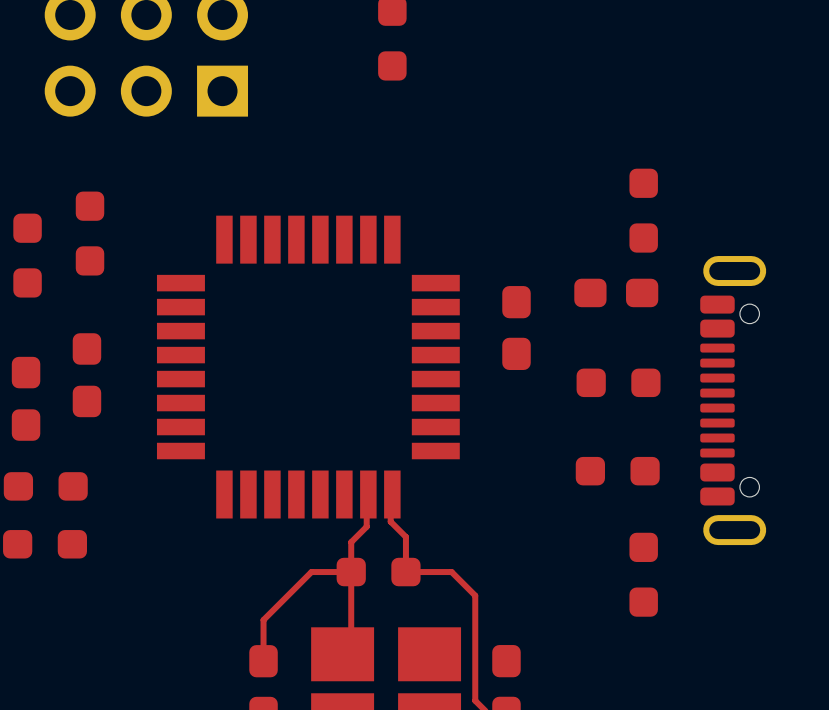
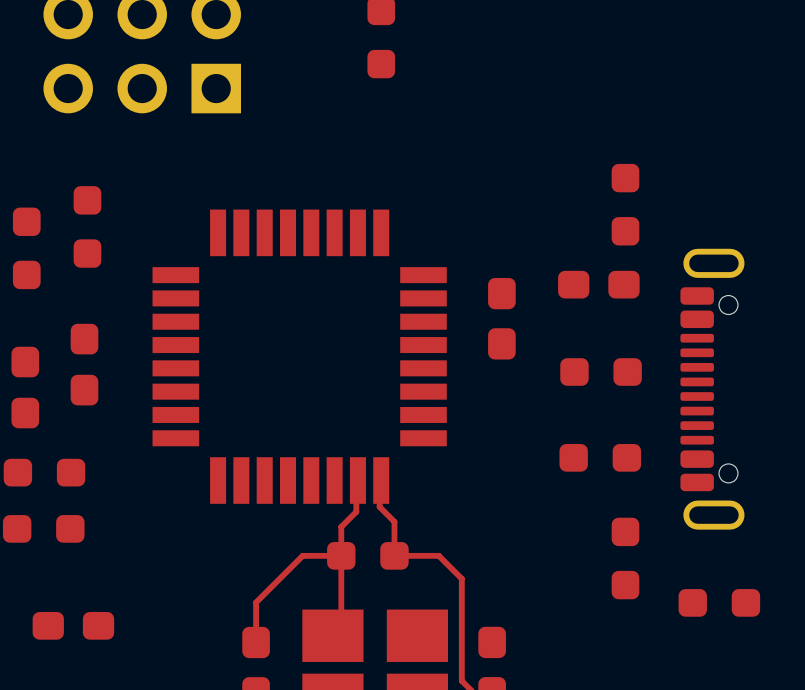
part: none -> (719, 602)
part: none -> (73, 625)

